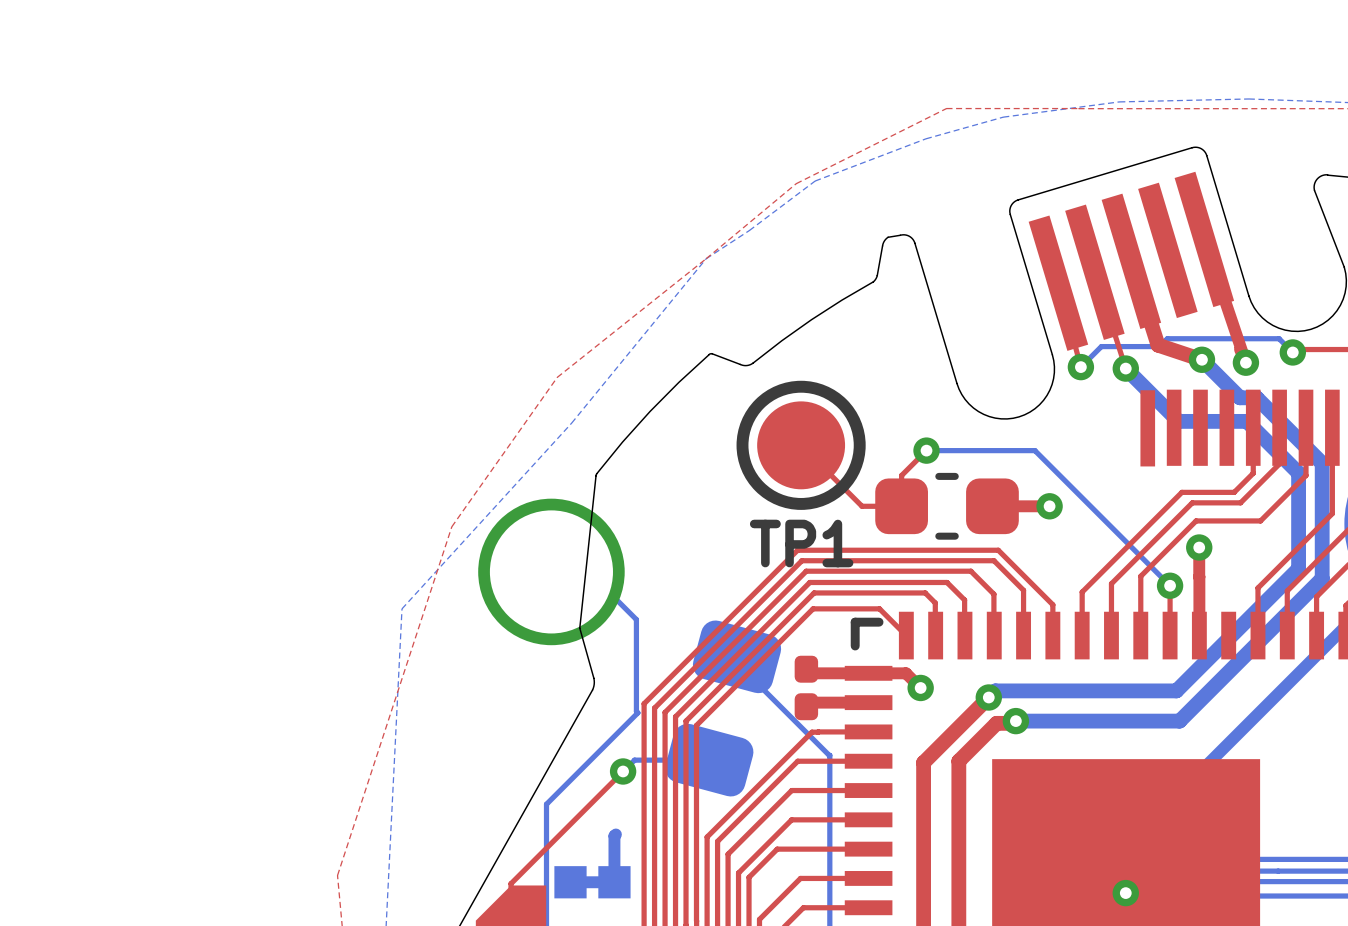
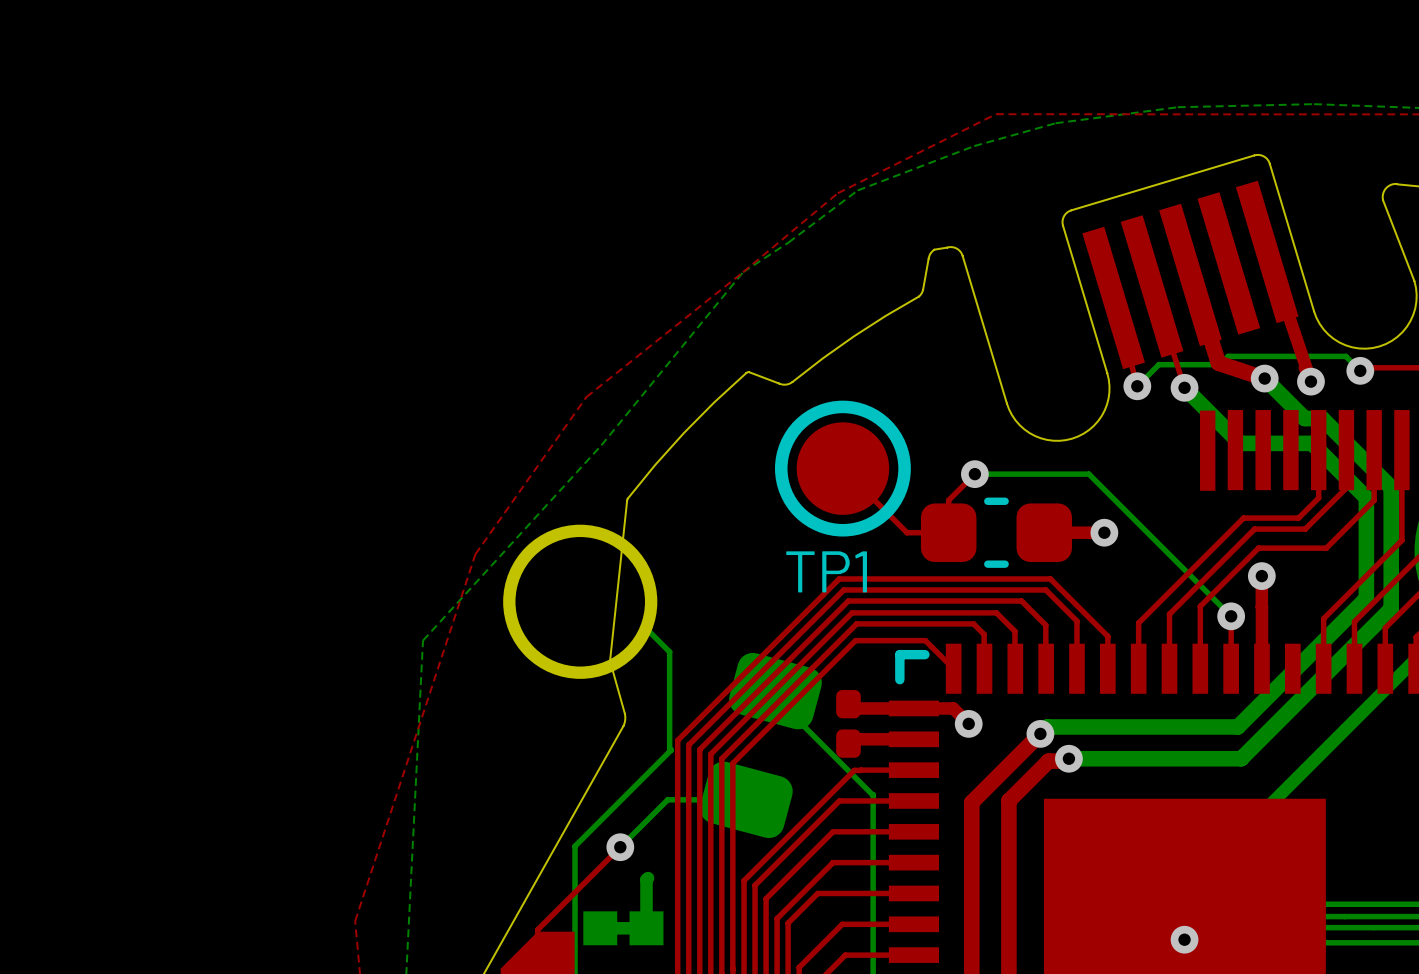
top track: (623, 771) (589, 805) -> none
bottom track: none -> (655, 811) (620, 847)
via position: (623, 771) -> (620, 847)

